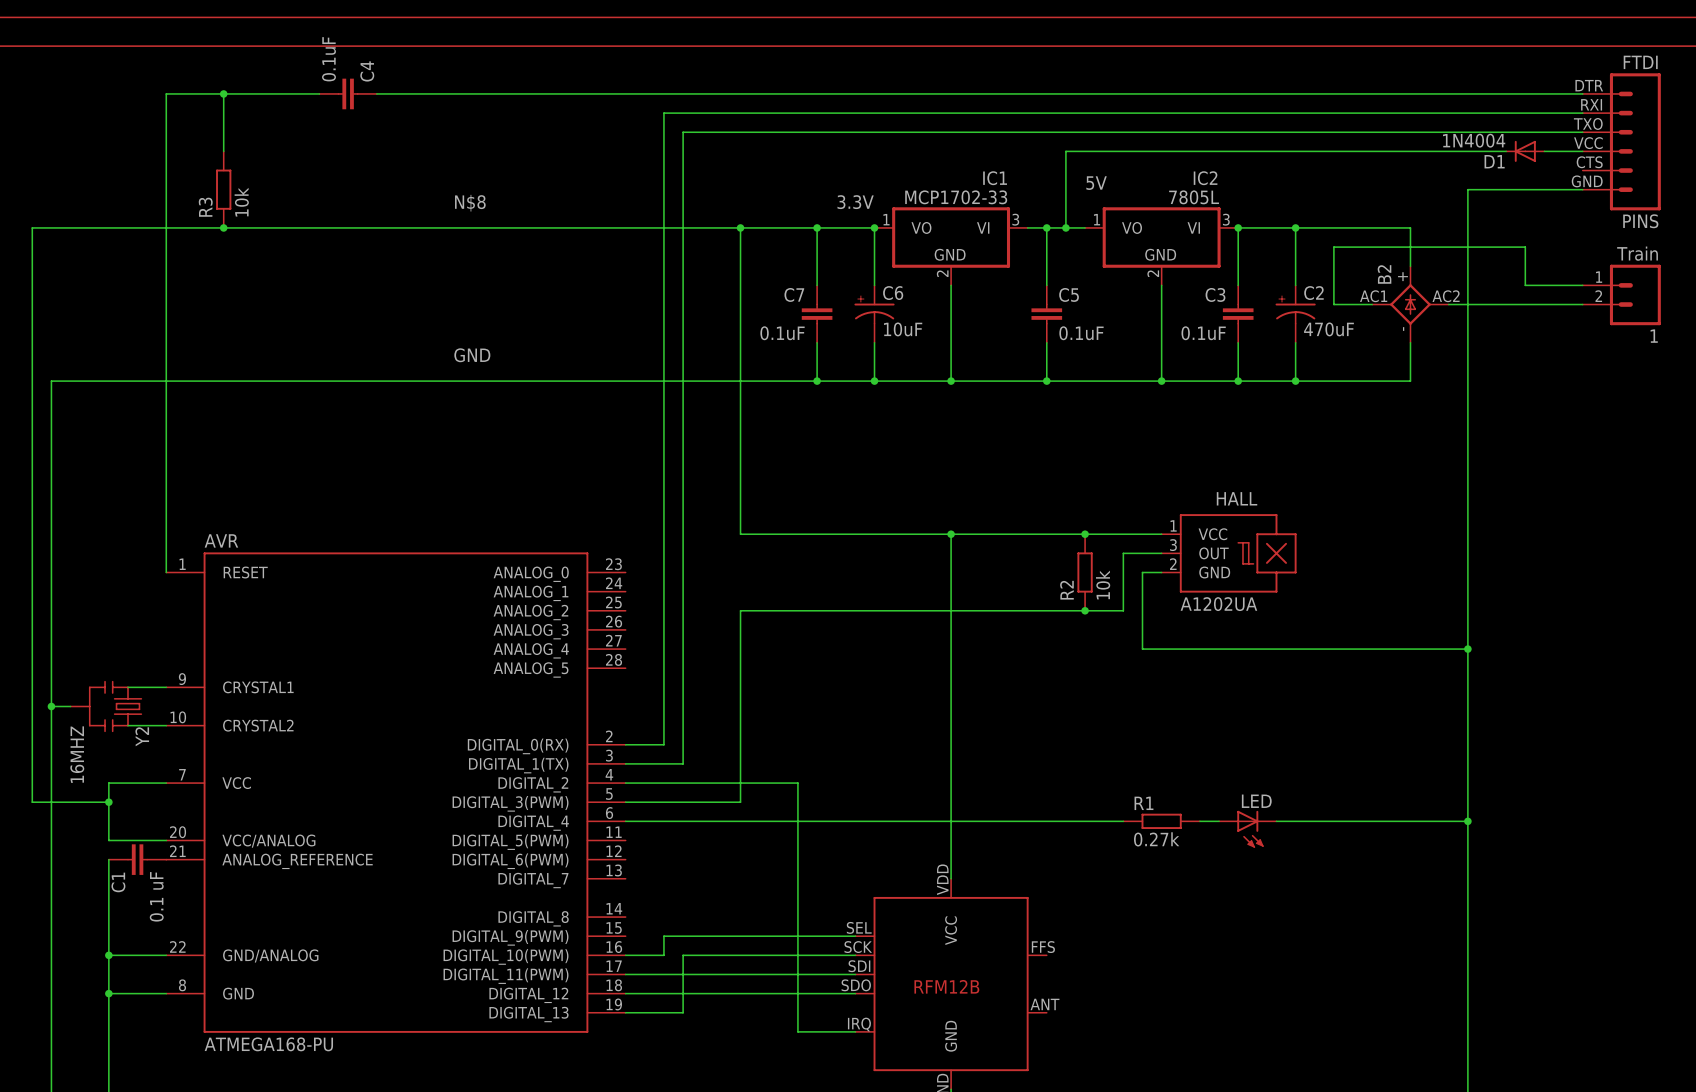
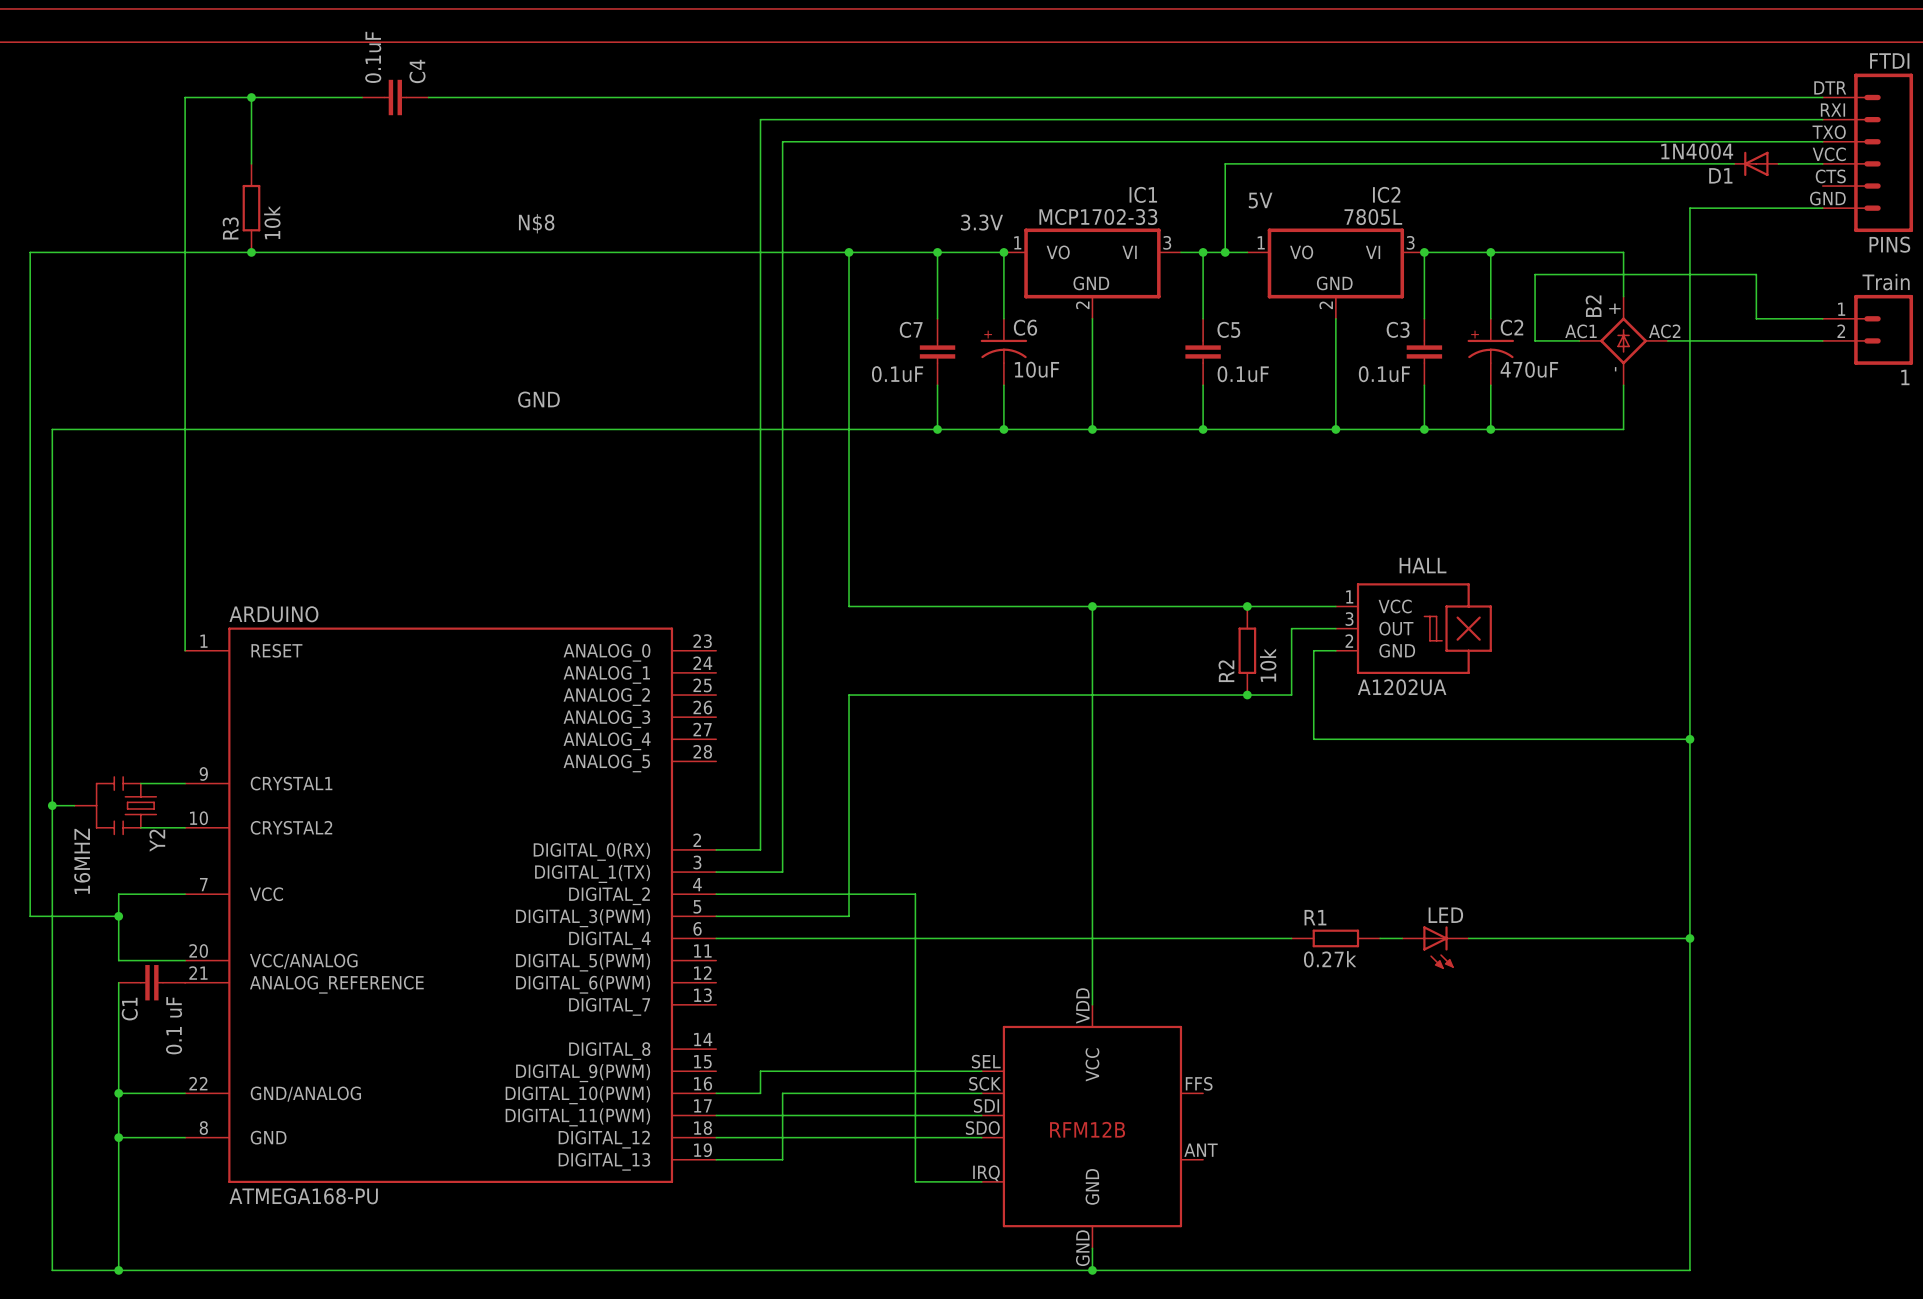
AVR name: AVR (221, 540) -> ARDUINO (273, 614)

